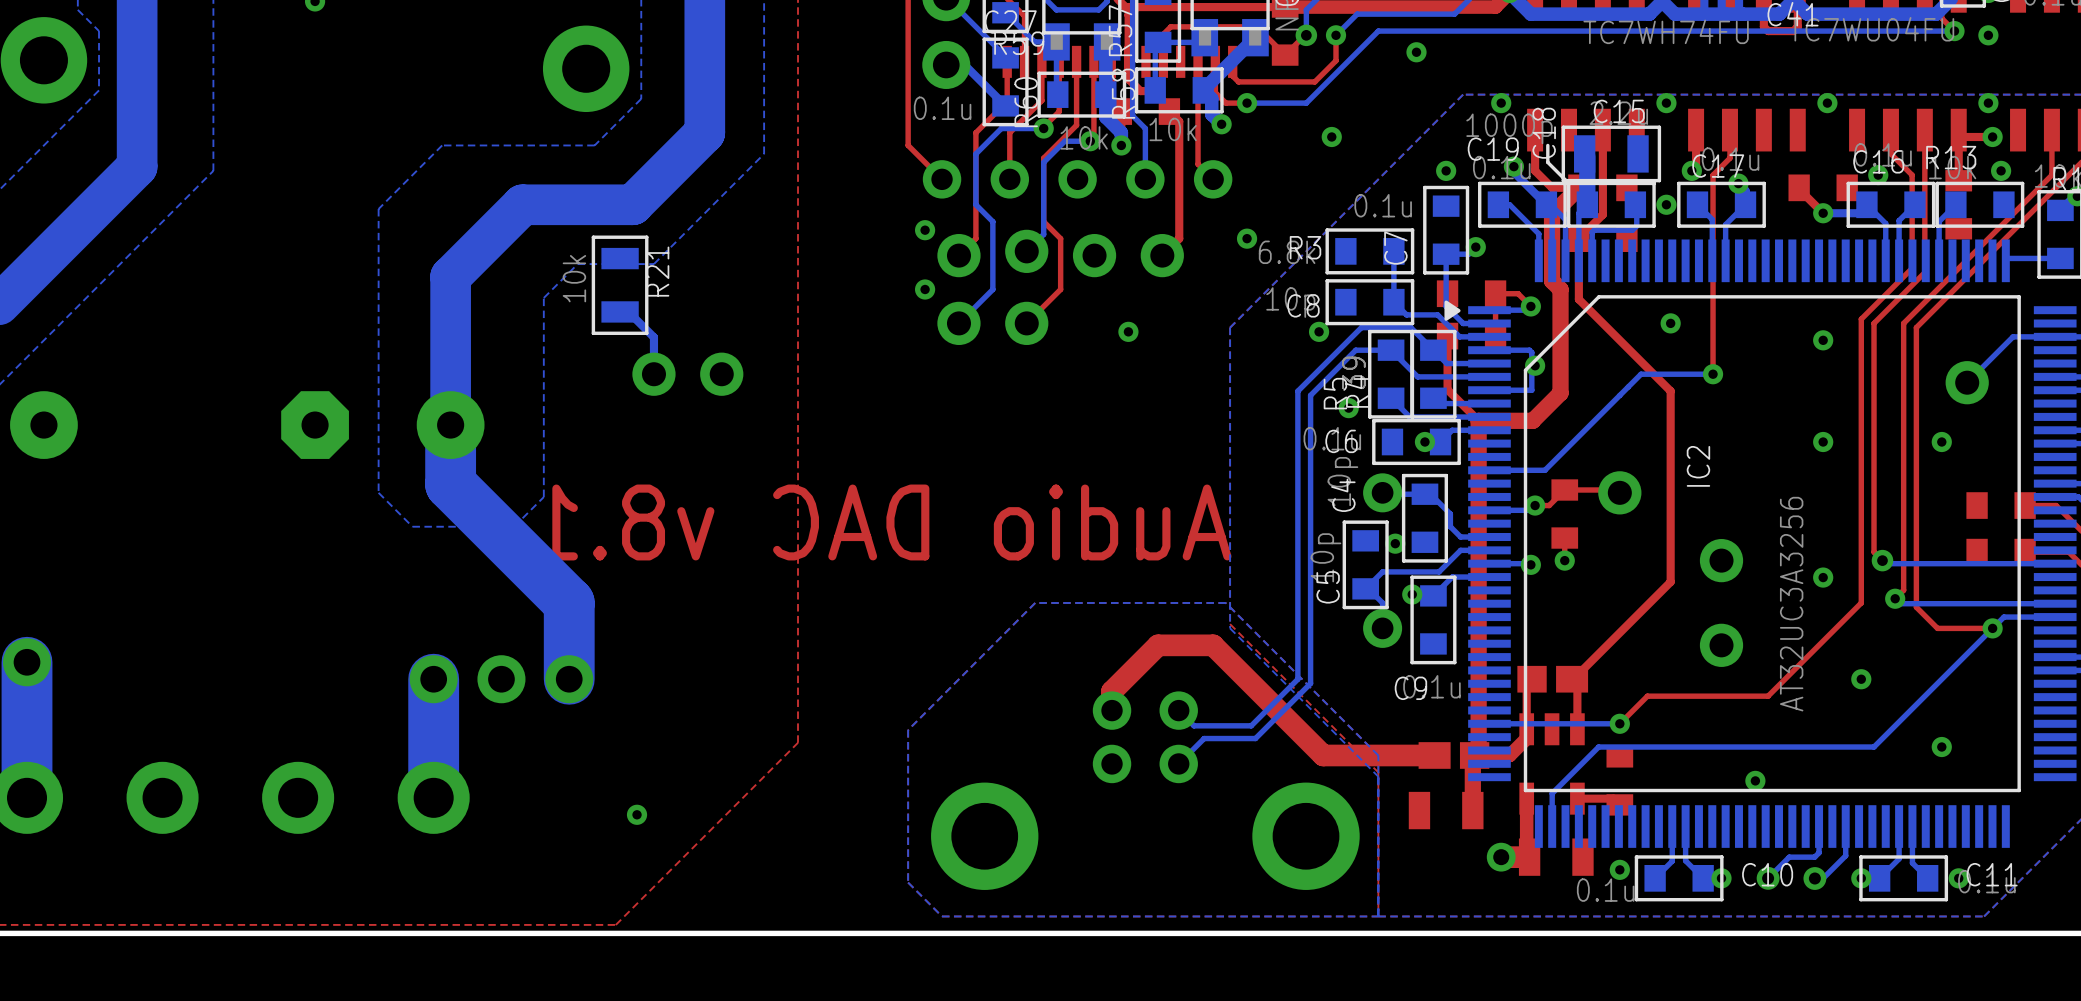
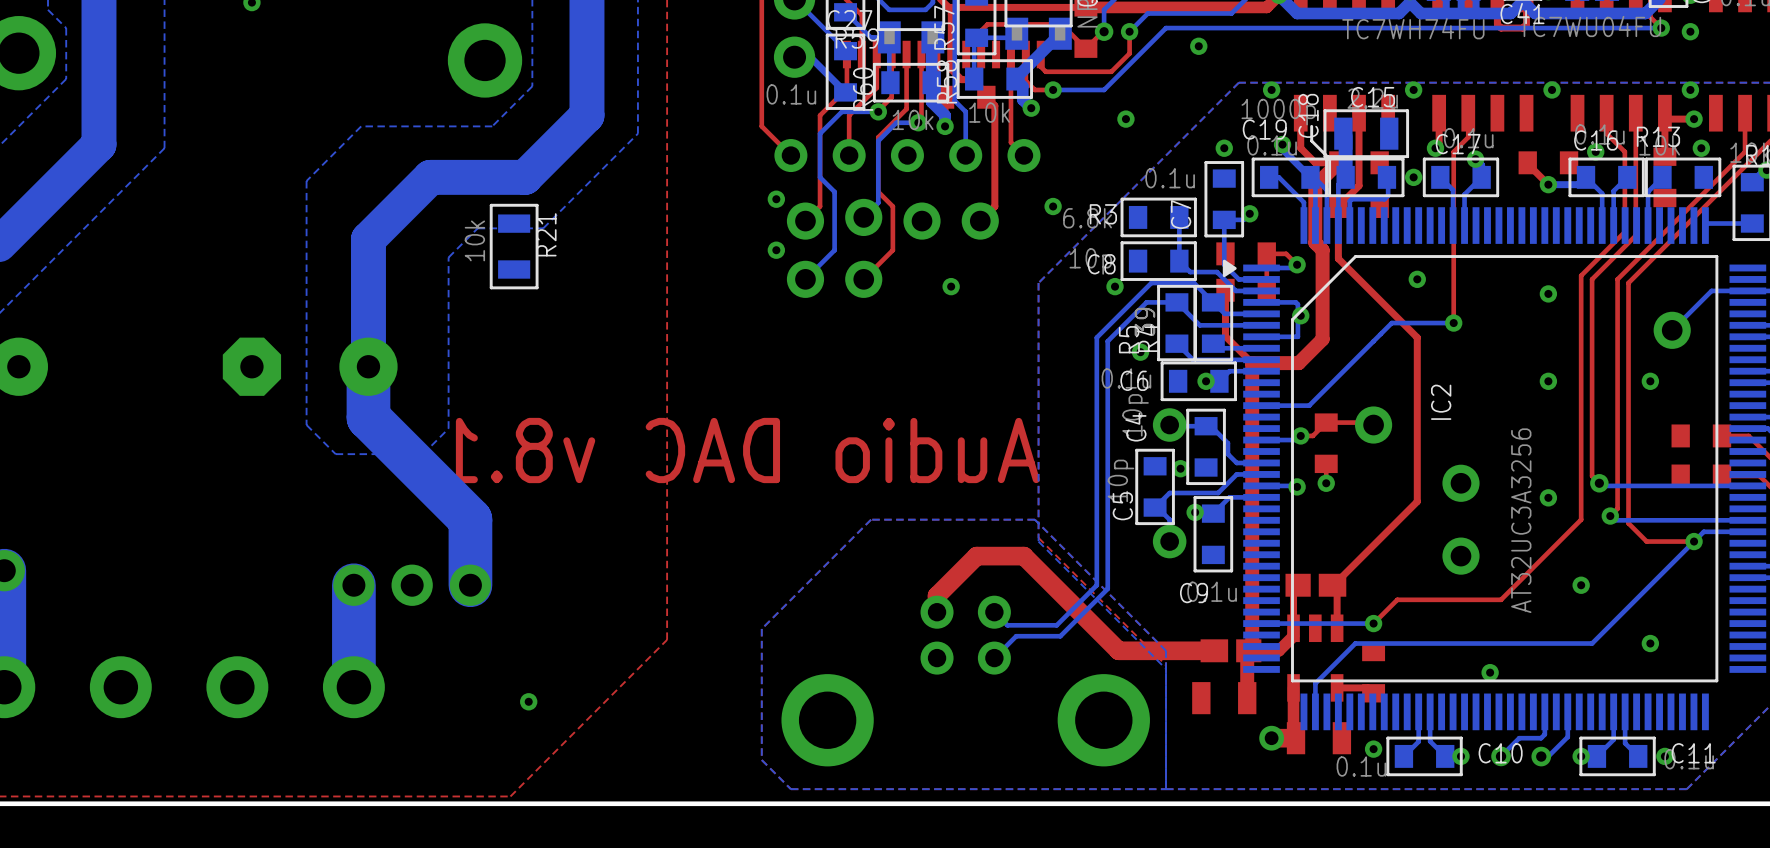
bottom track: (620, 311) (628, 311) (653, 337) (653, 374) -> none
part: (653, 374) -> none
part: (721, 374) -> none

